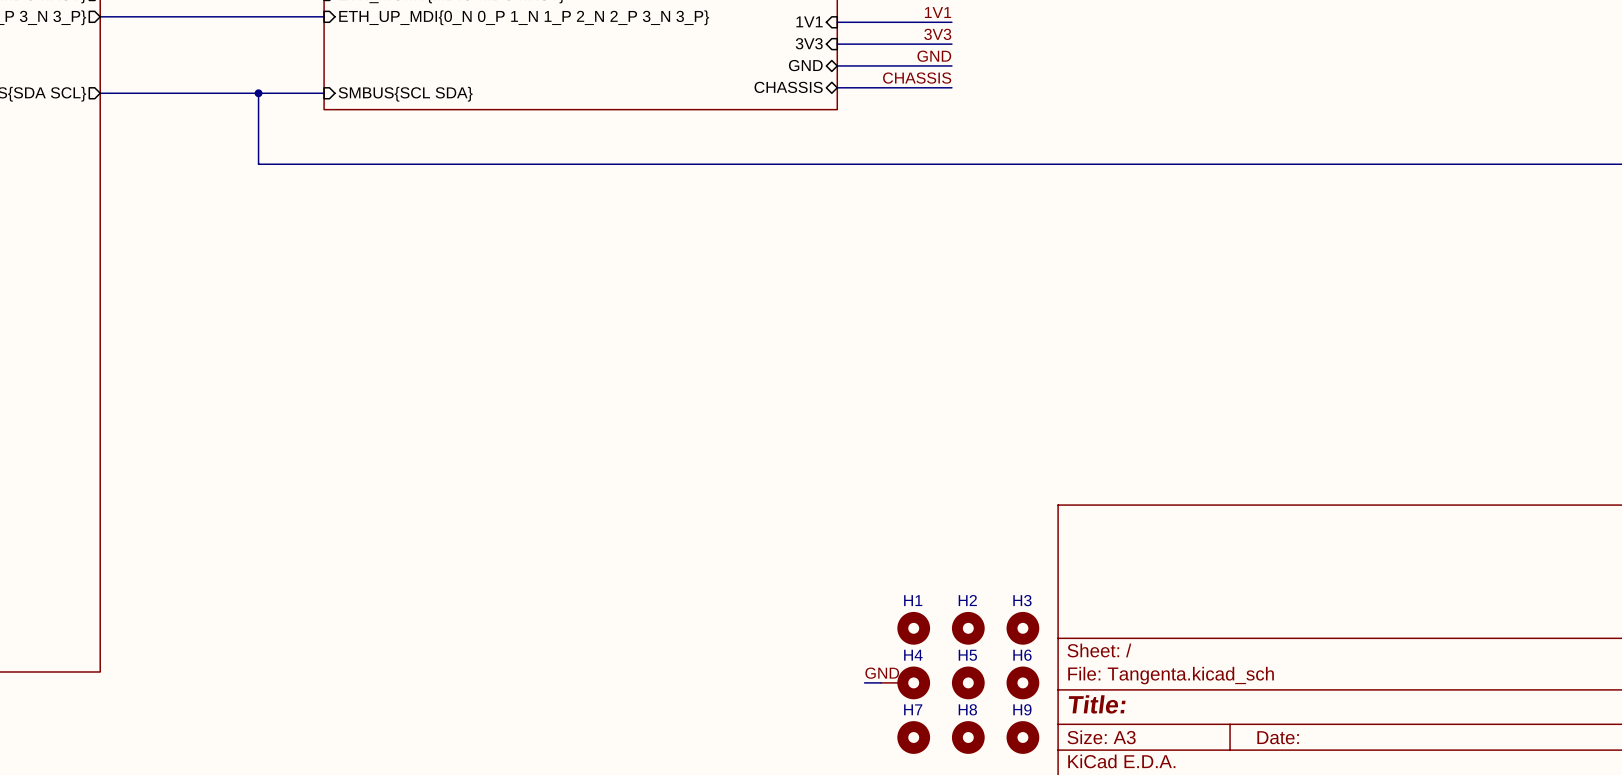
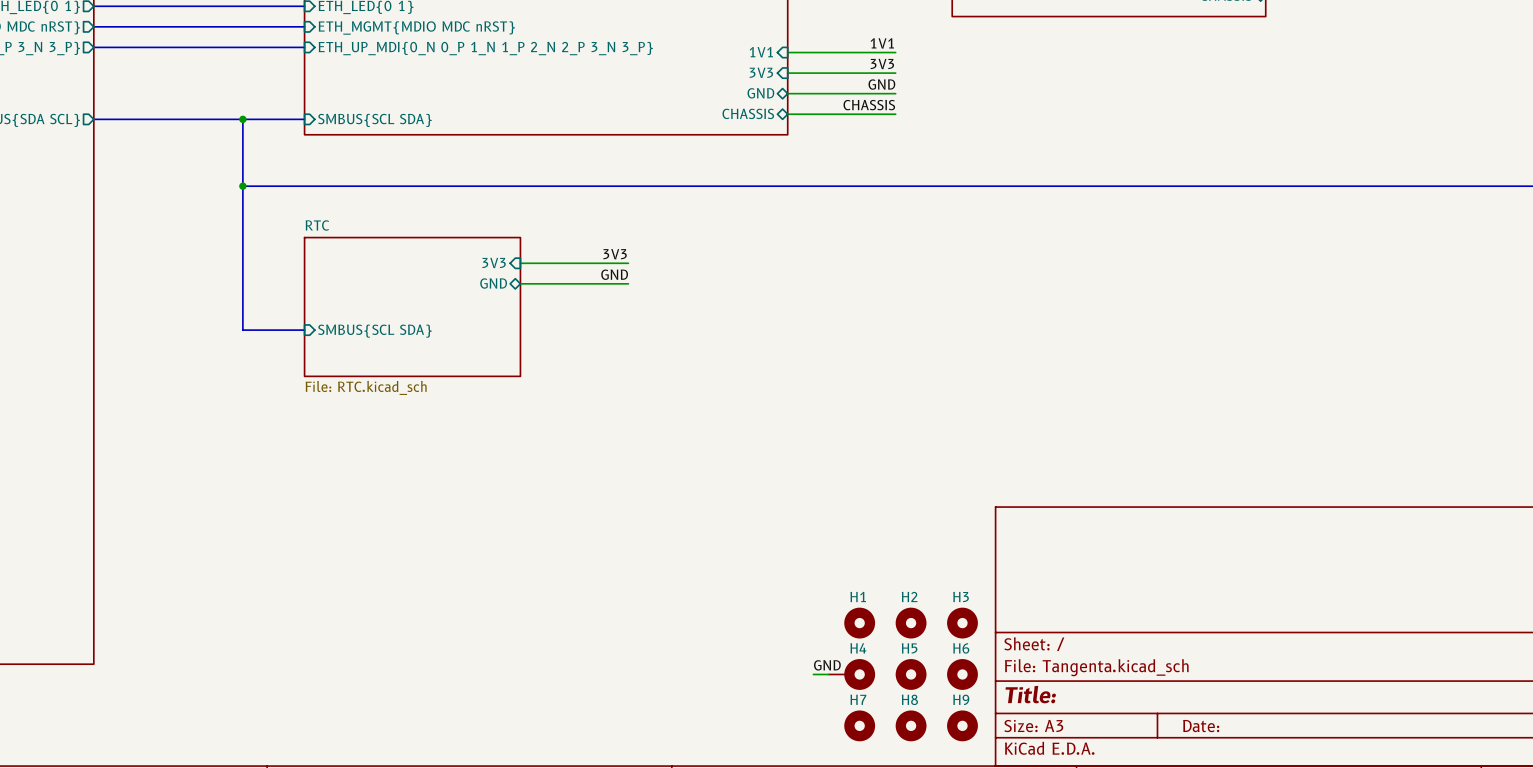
bus: none -> (242, 186) (242, 330) (304, 330)
junction: none -> (242, 186)
label: none -> 3V3 (615, 254)
sheet pin: none -> 3V3 (494, 262)
wire: none -> (520, 263) (628, 263)
label: none -> GND (614, 274)
sheet pin: none -> GND (493, 283)
wire: none -> (520, 283) (628, 283)
sheet RTC: none -> File: RTC.kicad_sch (412, 306)
sheet pin: none -> SMBUS{SCL SDA} (374, 331)

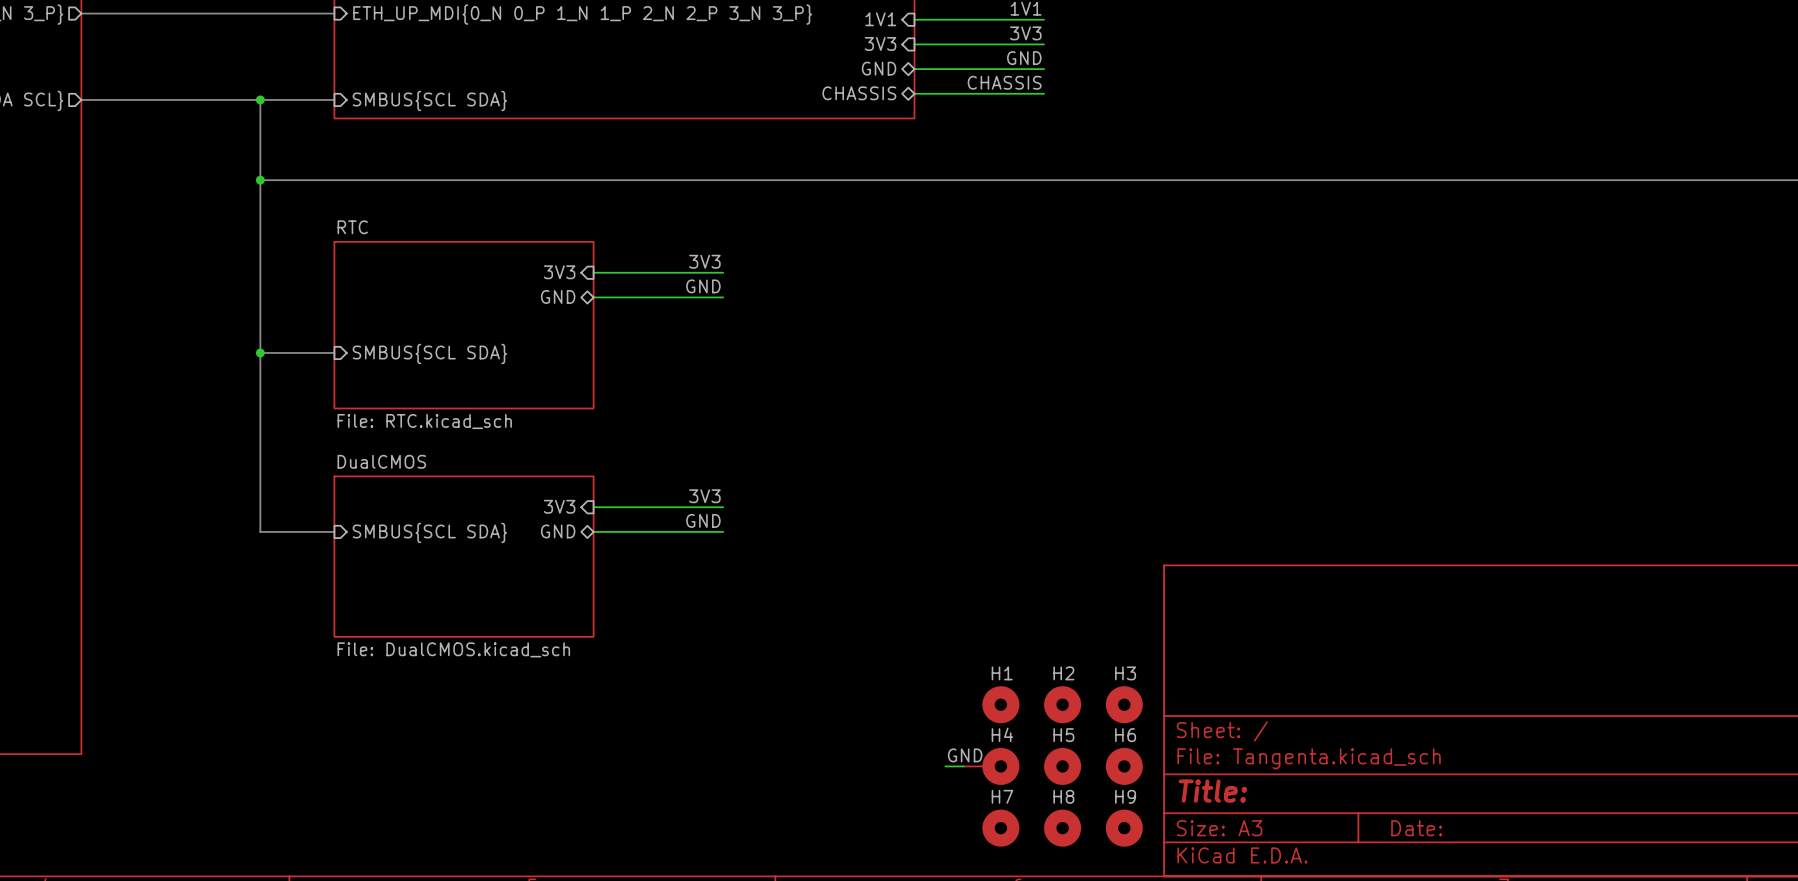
bus: none -> (260, 352) (260, 531) (334, 531)
junction: none -> (260, 352)
label: none -> 3V3 (704, 496)
sheet pin: none -> 3V3 (559, 506)
wire: none -> (593, 507) (723, 507)
label: none -> GND (703, 520)
sheet pin: none -> GND (558, 531)
wire: none -> (593, 531) (723, 531)
sheet pin: none -> SMBUS{SCL SDA} (429, 532)
sheet DualCMOS: none -> File: DualCMOS.kicad_sch (464, 556)

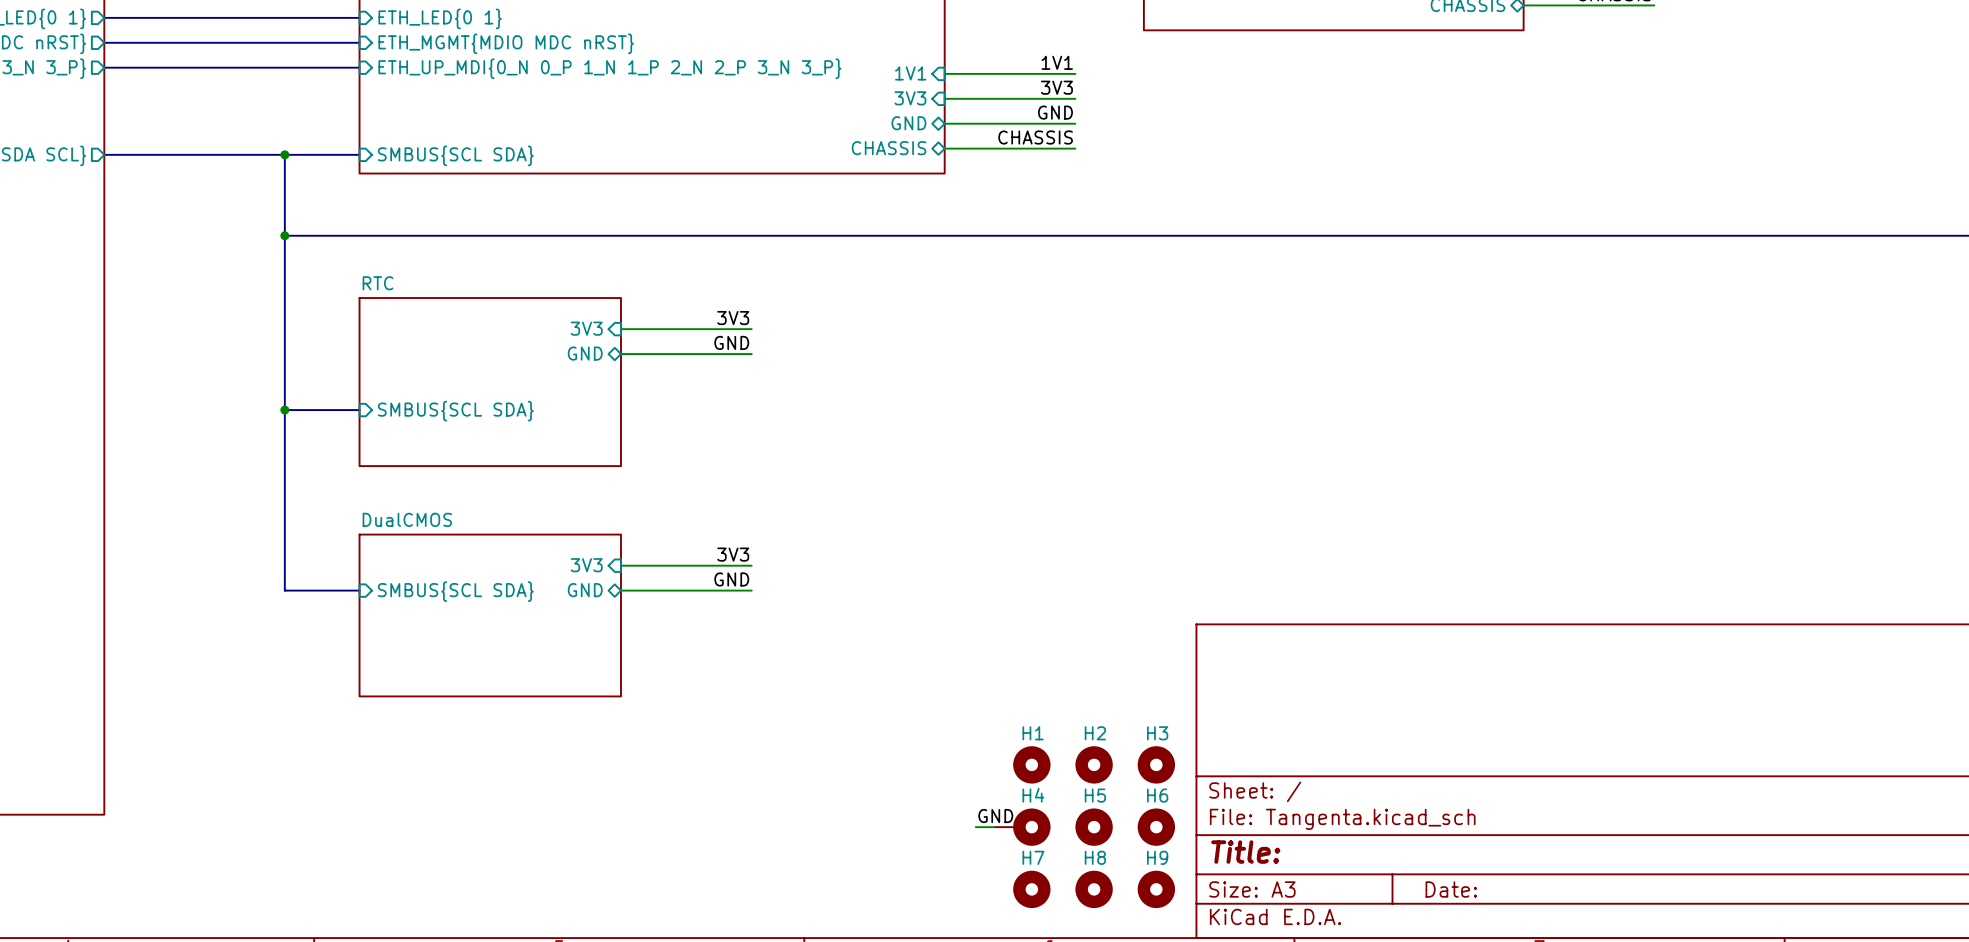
sheet RTC value: File: RTC.kicad_sch (424, 421) -> none
sheet DualCMOS value: File: DualCMOS.kicad_sch (453, 649) -> none

